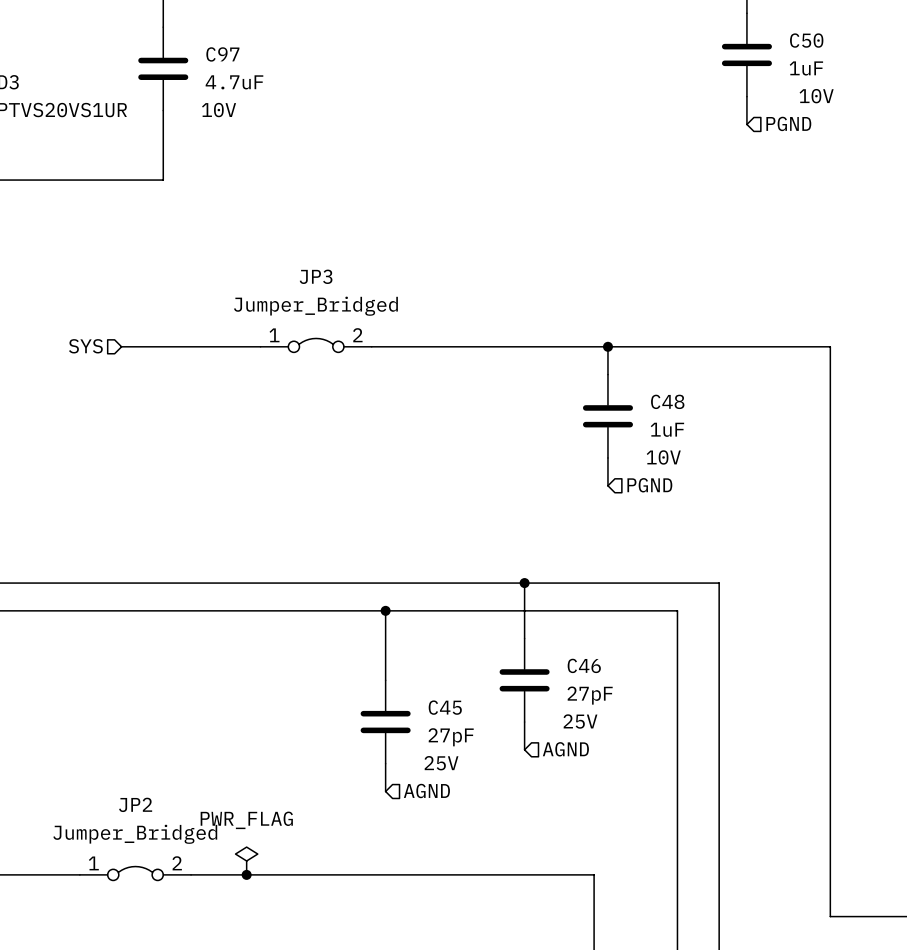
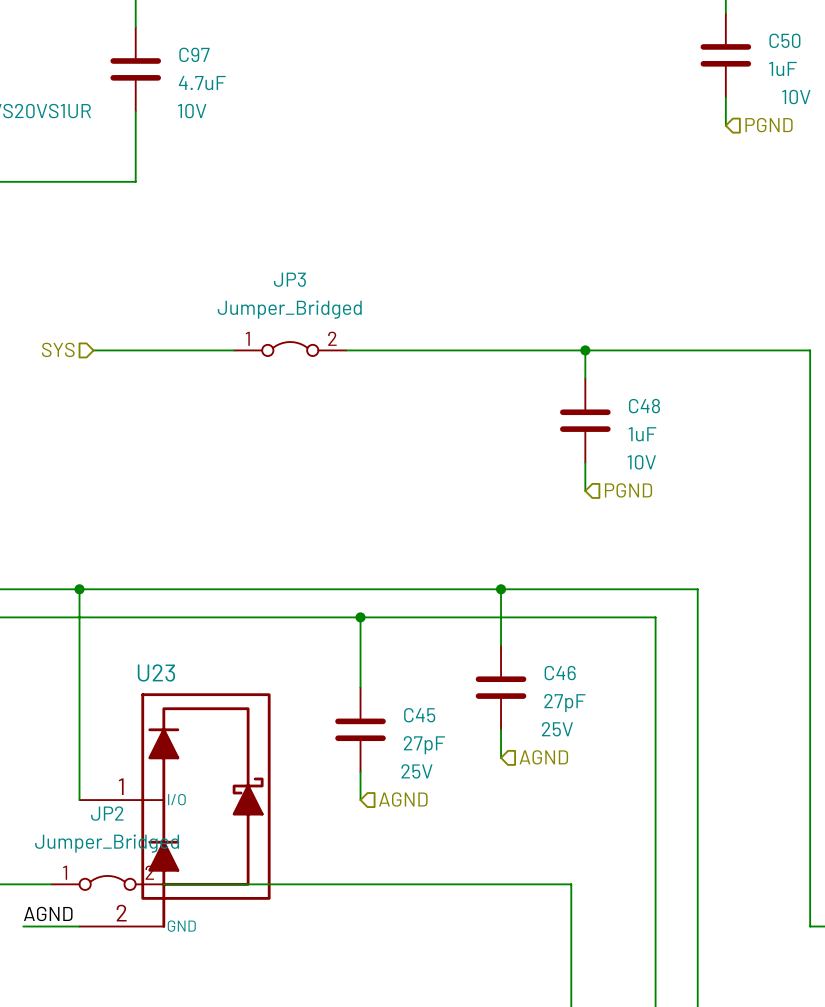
wire: none -> (79, 589) (79, 800)
junction: none -> (79, 589)
U23: none -> (175, 810)
power symbol: PWR_FLAG (246, 861) -> none
junction: (246, 874) -> none
label: none -> AGND (48, 913)
wire: none -> (23, 926) (79, 926)

